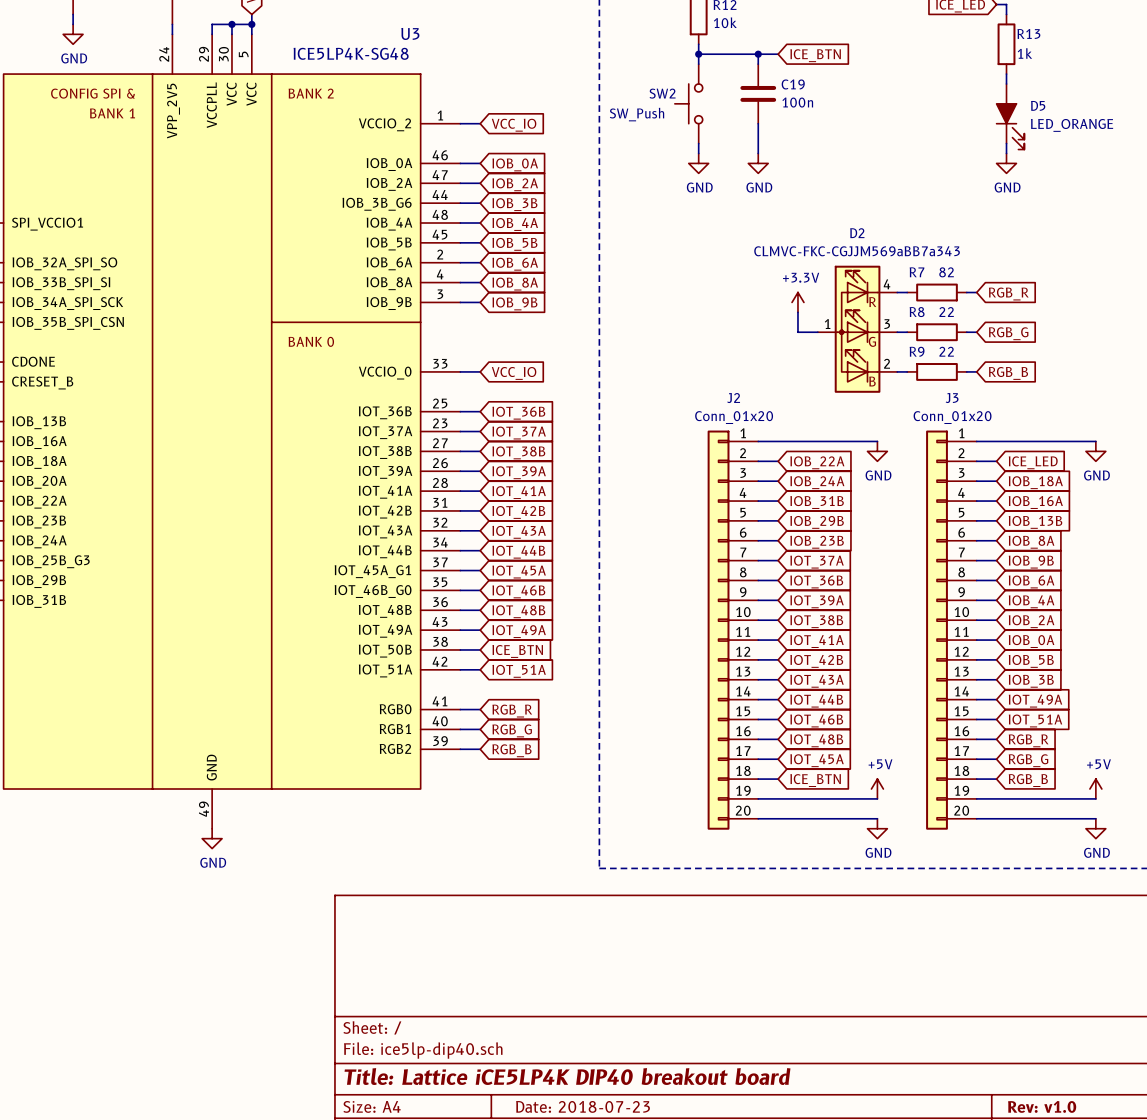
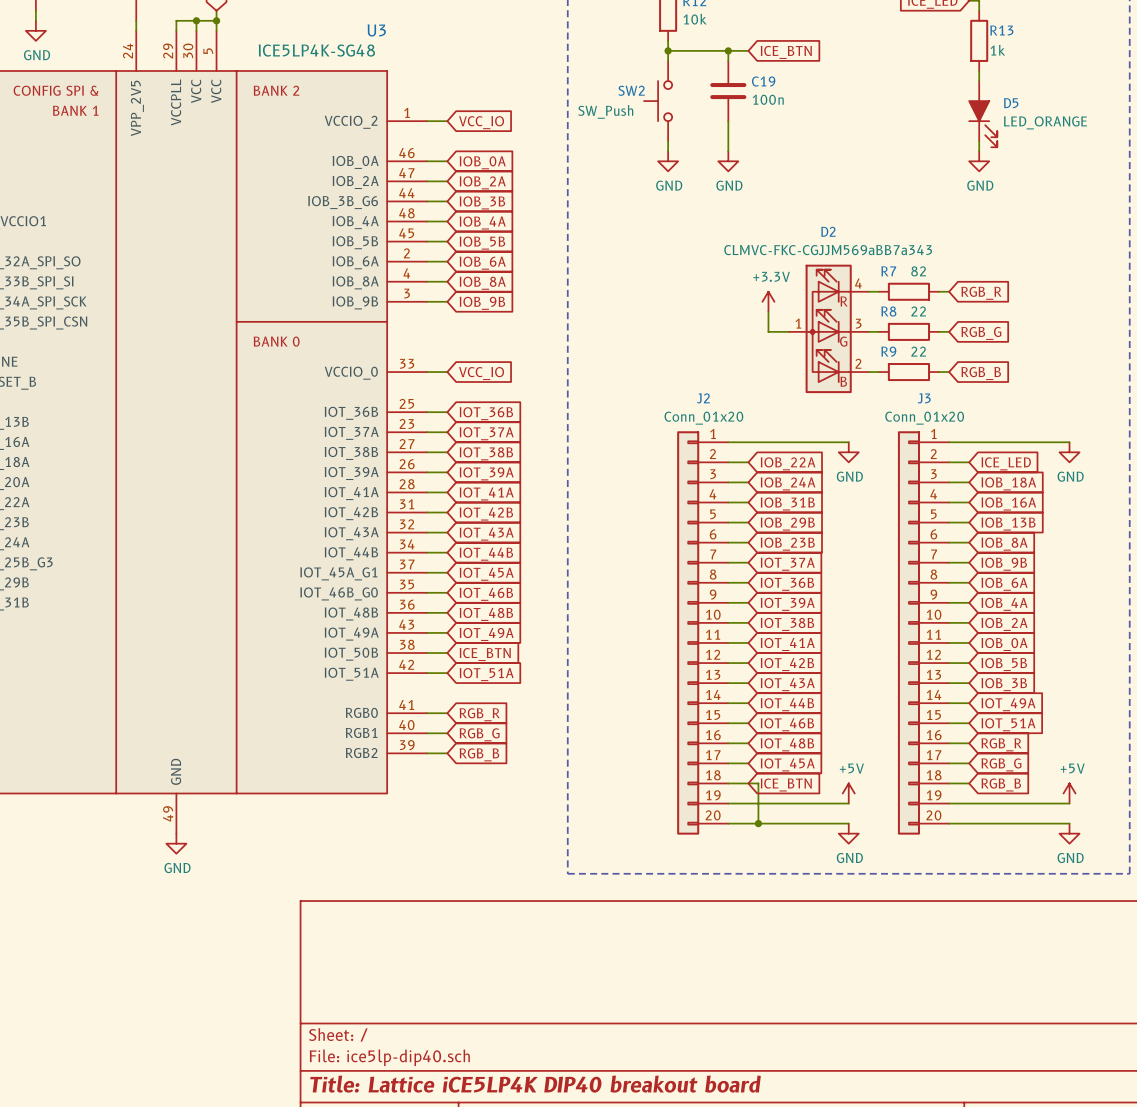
wire: none -> (748, 783) (758, 783) (758, 823)
junction: none -> (758, 823)

